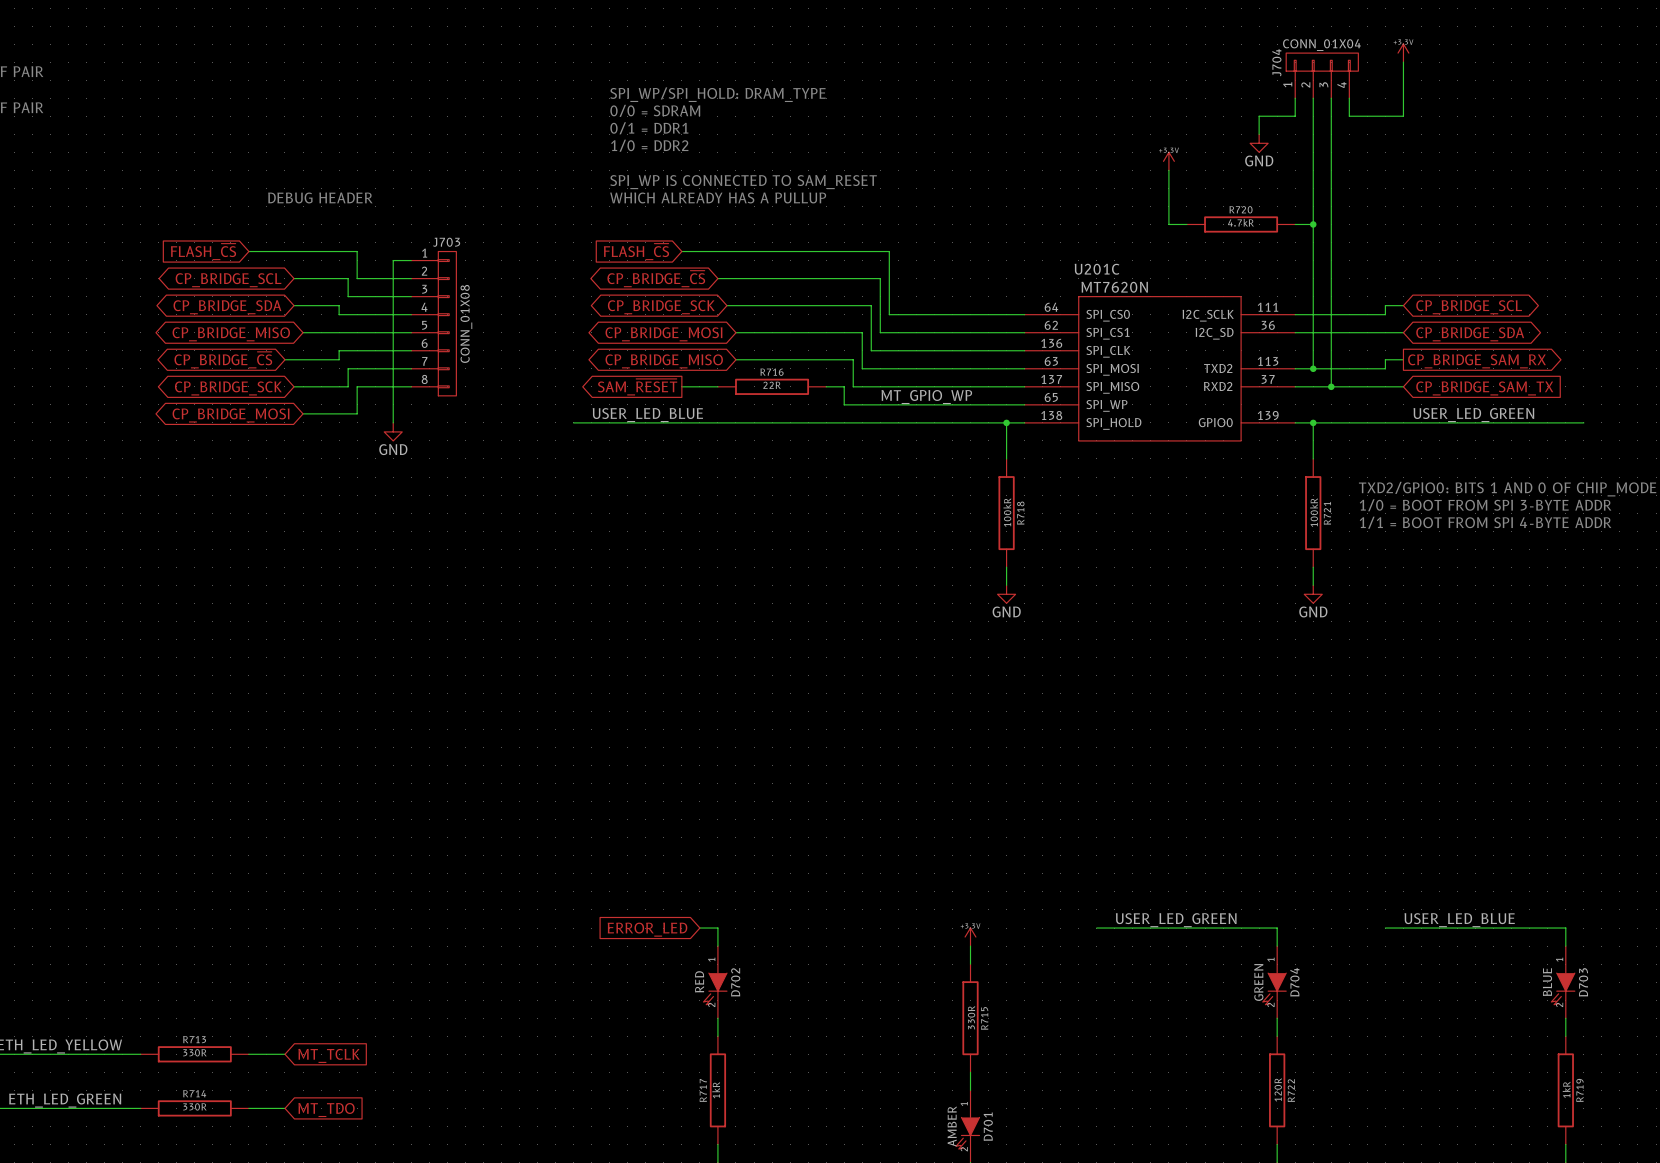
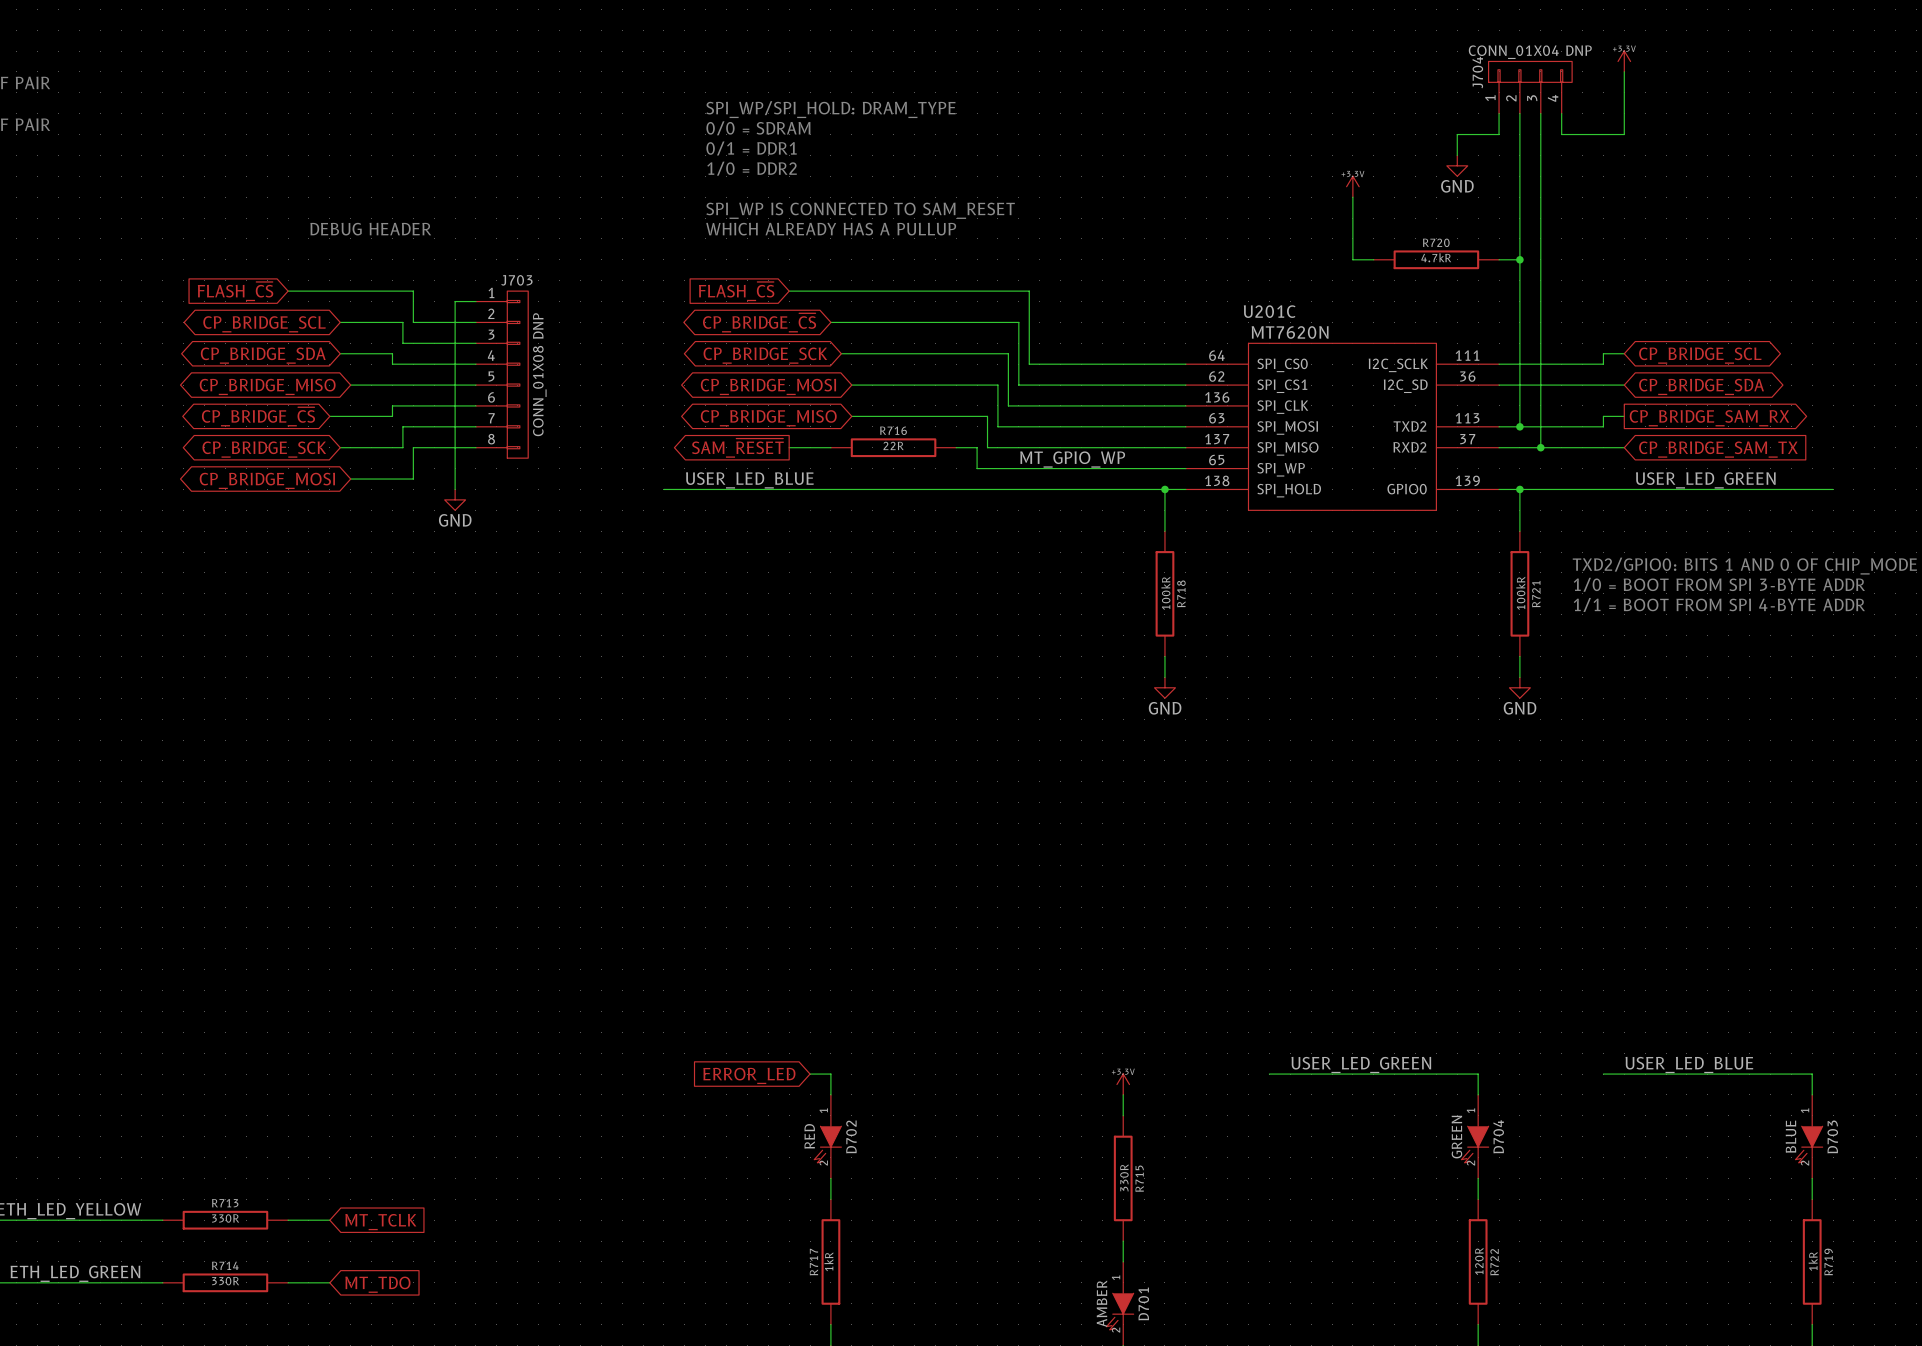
J704 value: CONN_01X04 (1321, 45) -> CONN_01X04 DNP (1530, 52)
J703 value: CONN_01X08 (466, 323) -> CONN_01X08 DNP (539, 374)

